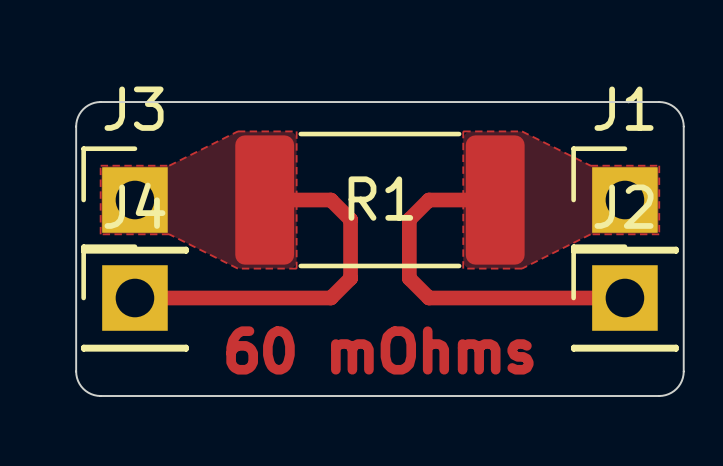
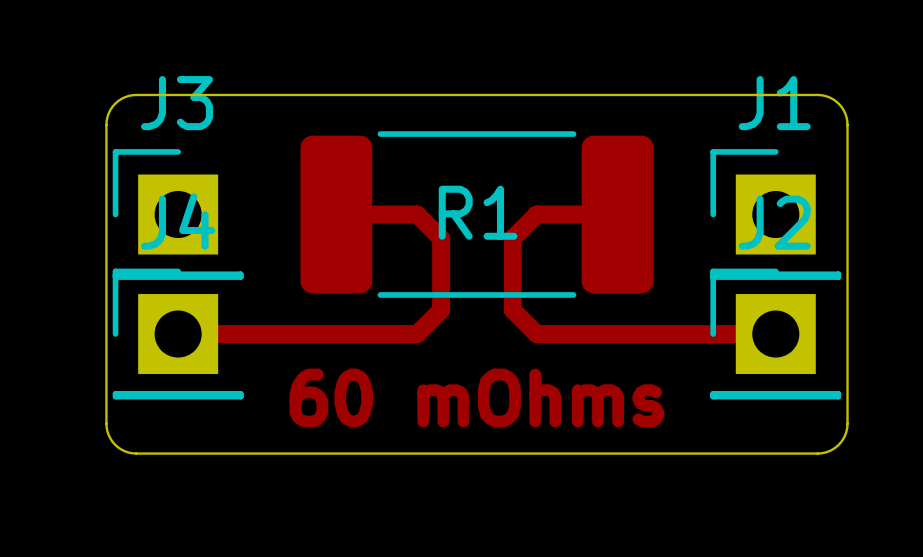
top zone outline: (237, 131) (169, 165) (100, 165) (100, 234) (169, 234) (237, 268) (296, 268) (296, 131) (237, 131) -> none
top zone outline: (463, 131) (522, 131) (590, 165) (659, 165) (659, 234) (590, 234) (522, 268) (463, 268) (463, 131) -> none

